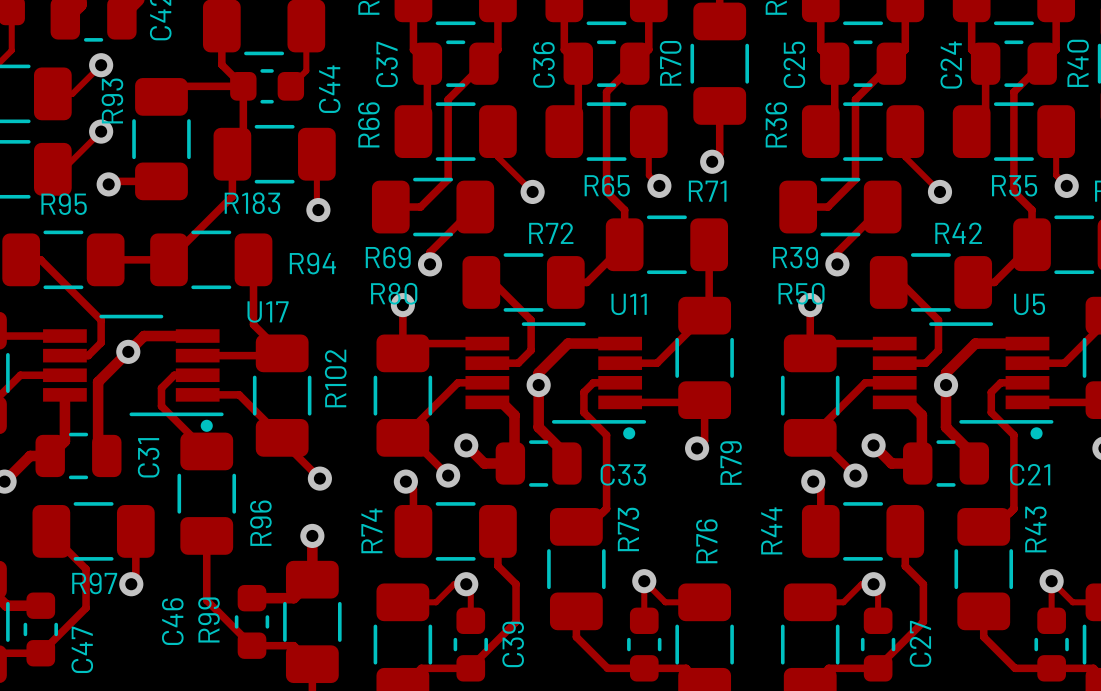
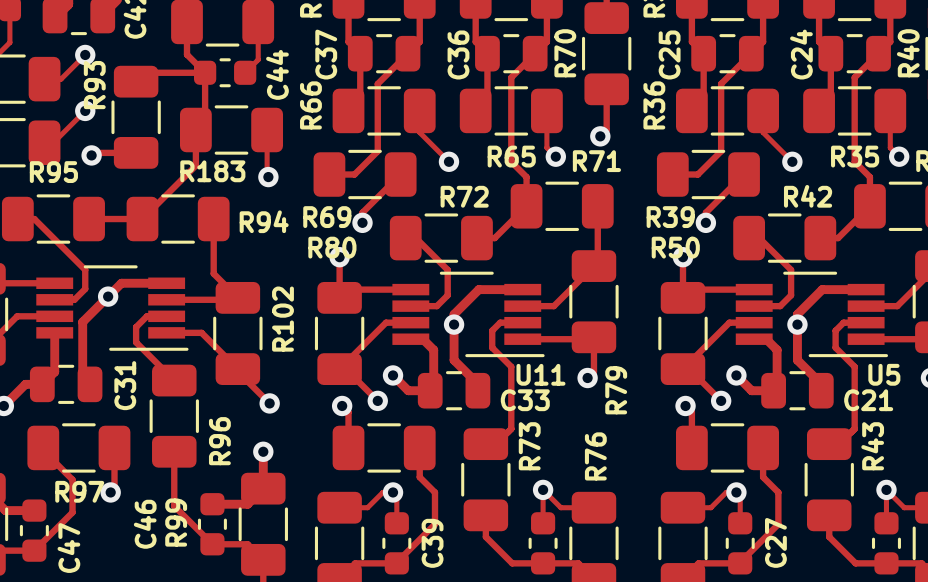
U11 name position: U11 (629, 304) -> U11 (540, 374)
U5 name position: U5 (1029, 304) -> U5 (884, 374)
U11 footprint: [465, 322, 647, 440] -> [392, 271, 545, 358]
U5 footprint: [872, 322, 1054, 440] -> [735, 271, 889, 358]
U17: (133, 373) -> none
R74 name: R74 (371, 530) -> none
R44 name: R44 (771, 530) -> none

